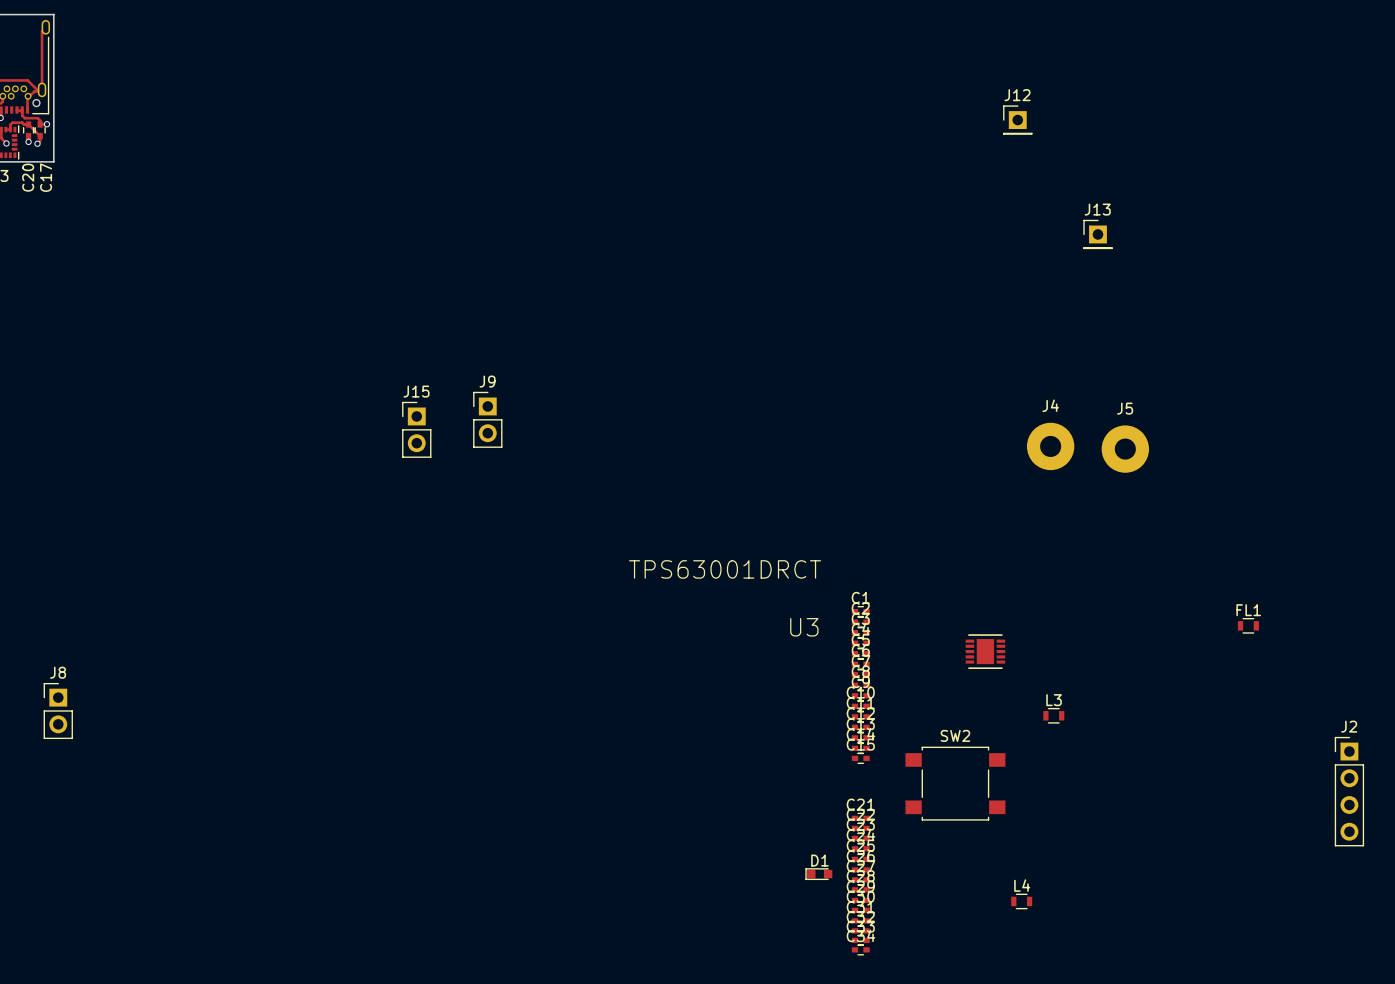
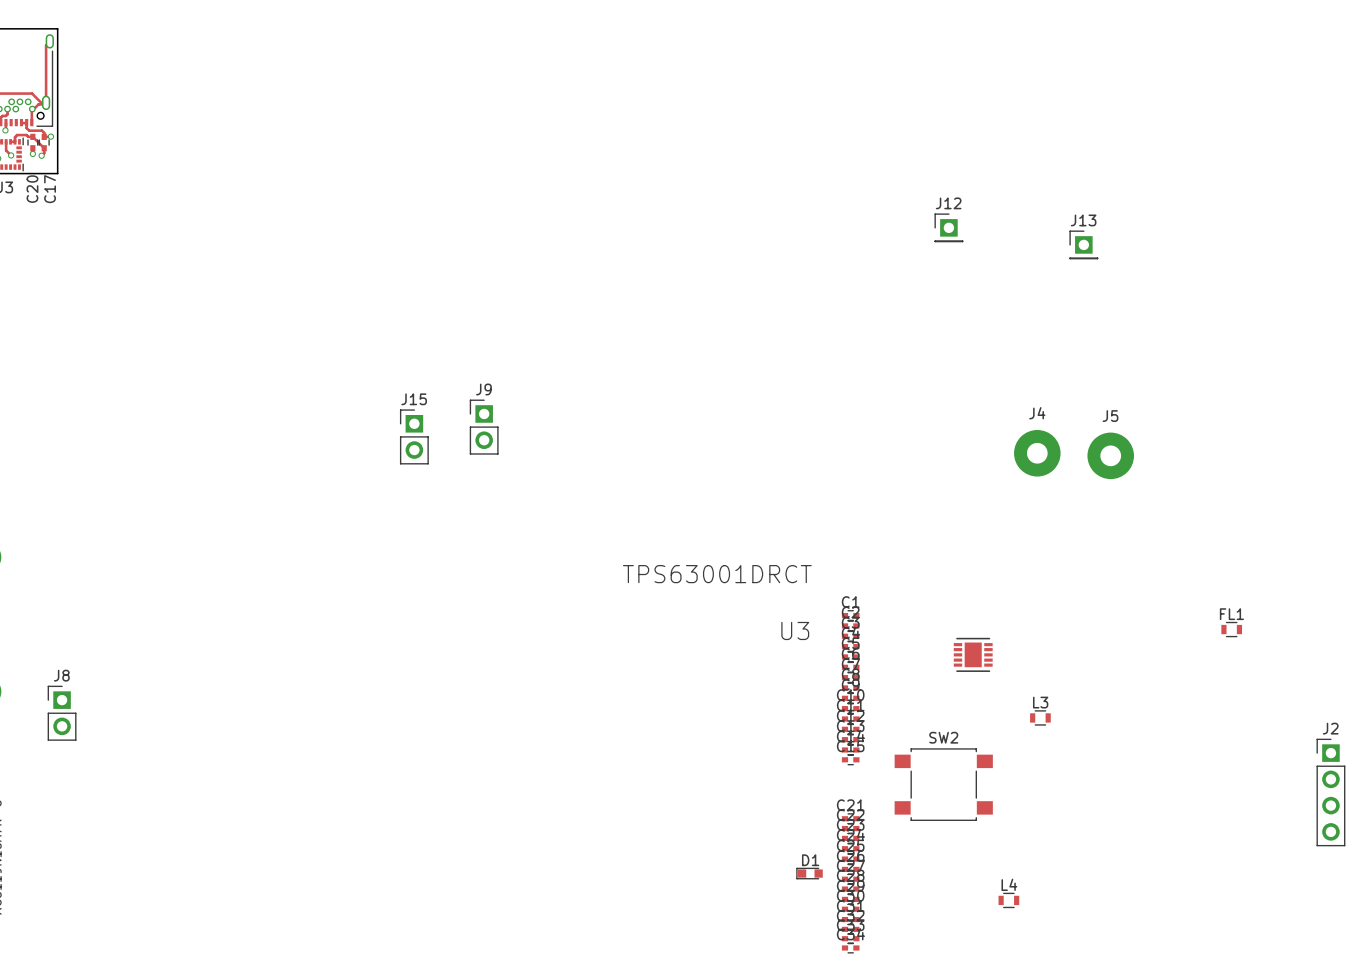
J12 position: (1017, 120) -> (948, 227)

